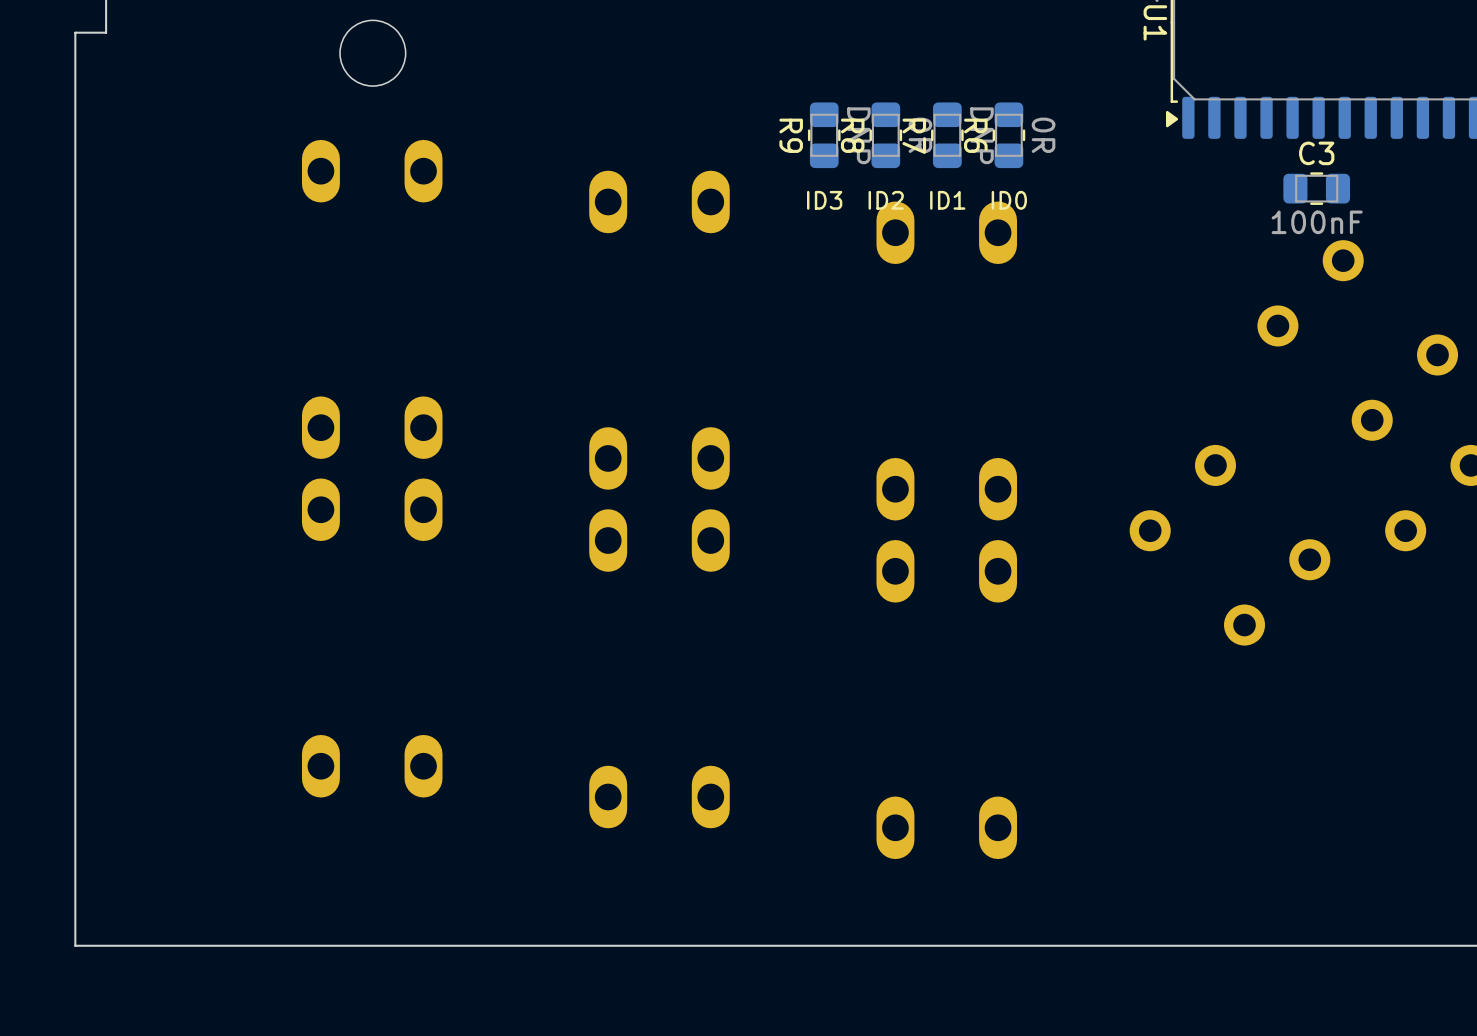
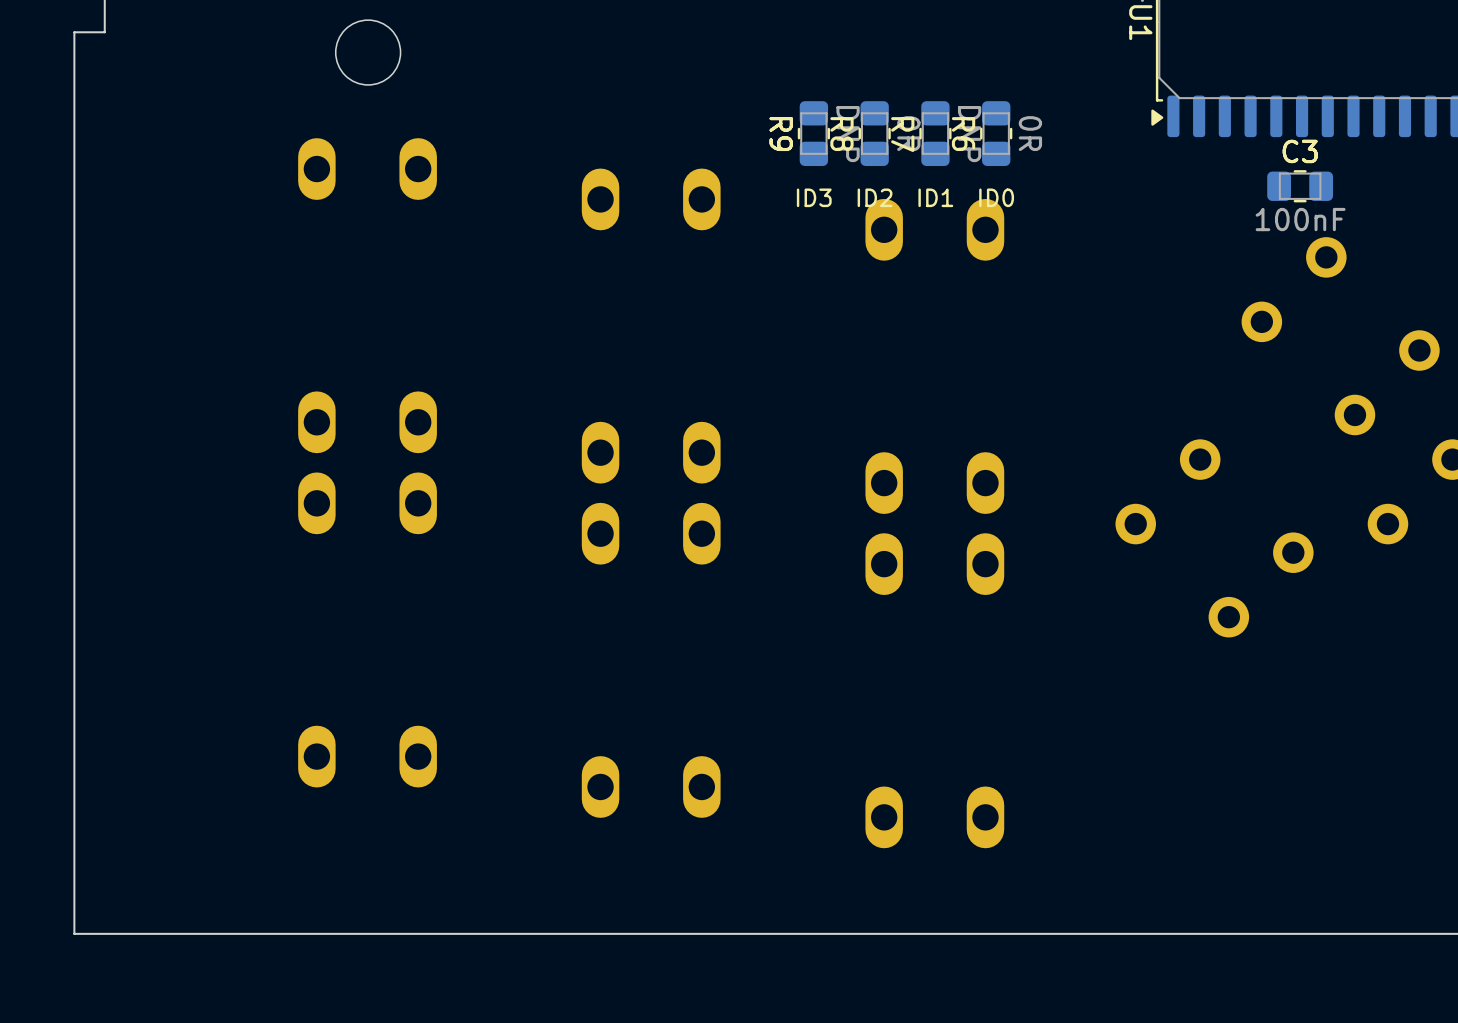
text: none -> R9 (781, 134)
text: none -> C3 (1300, 151)

